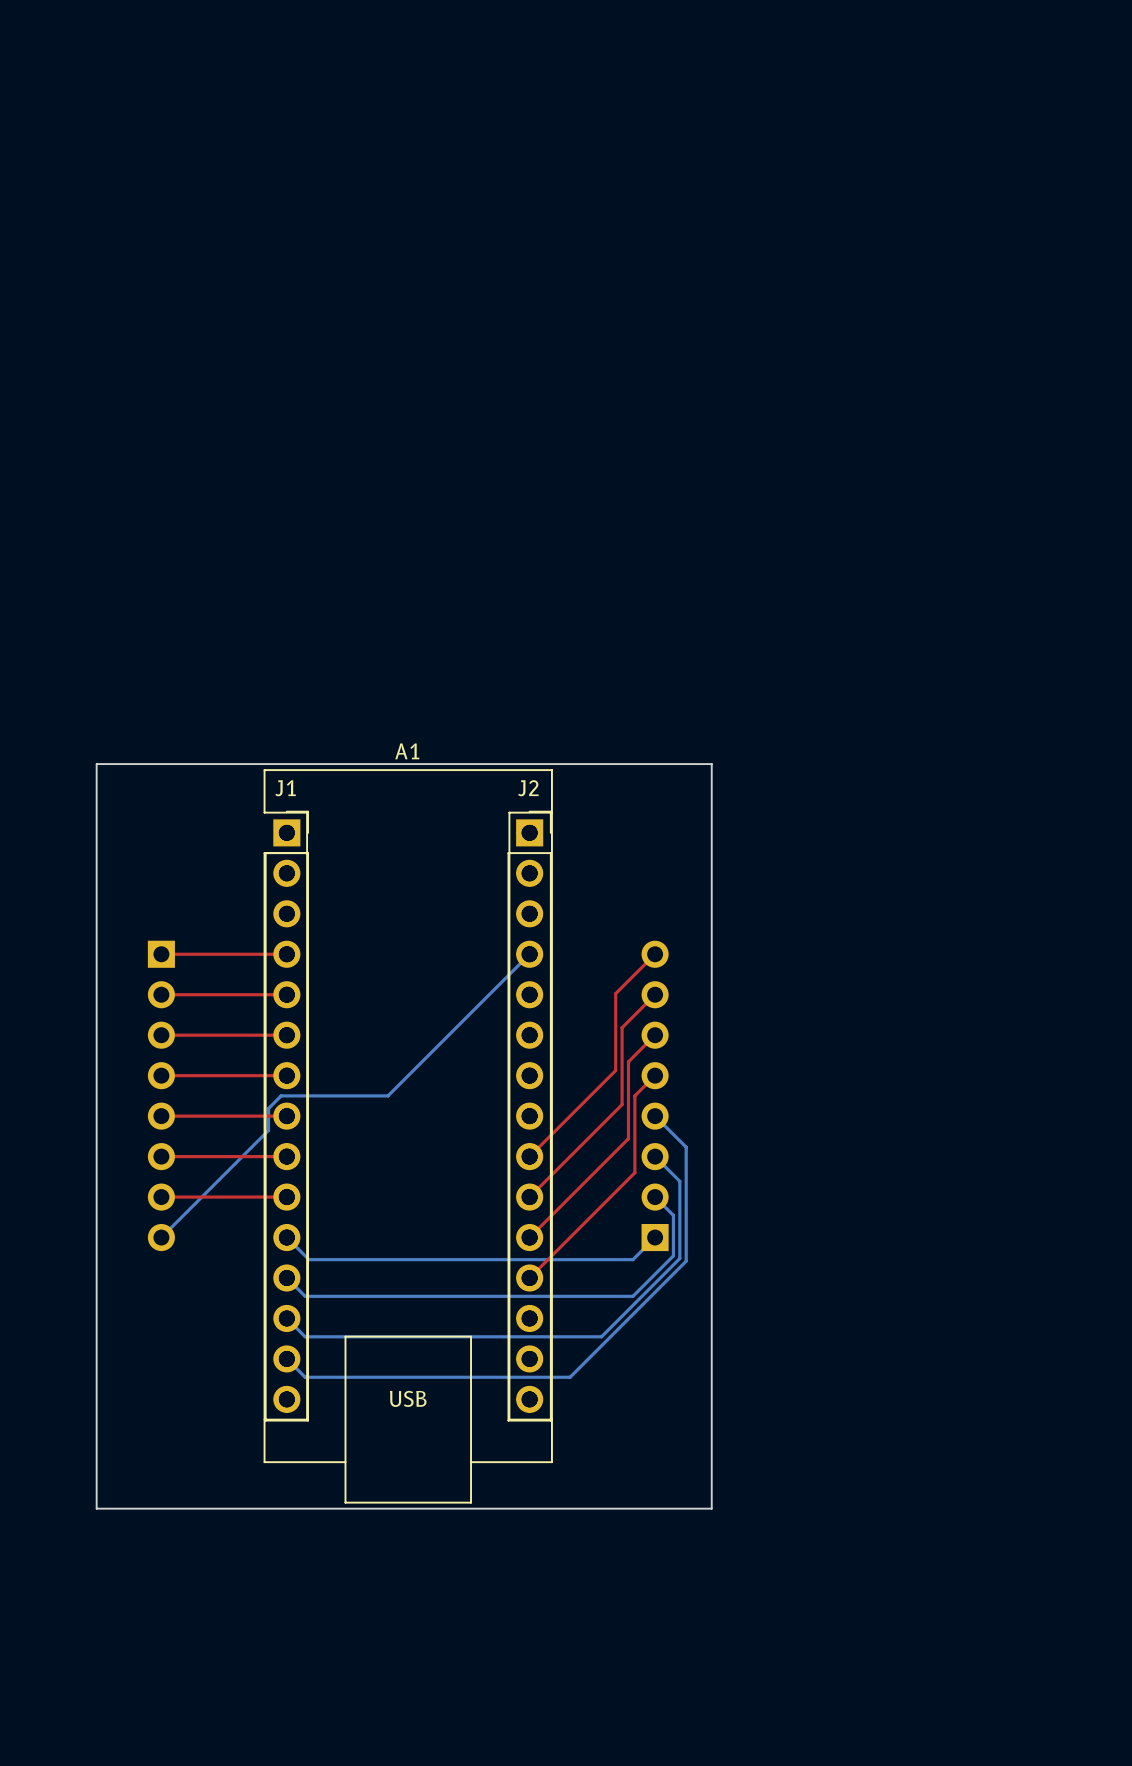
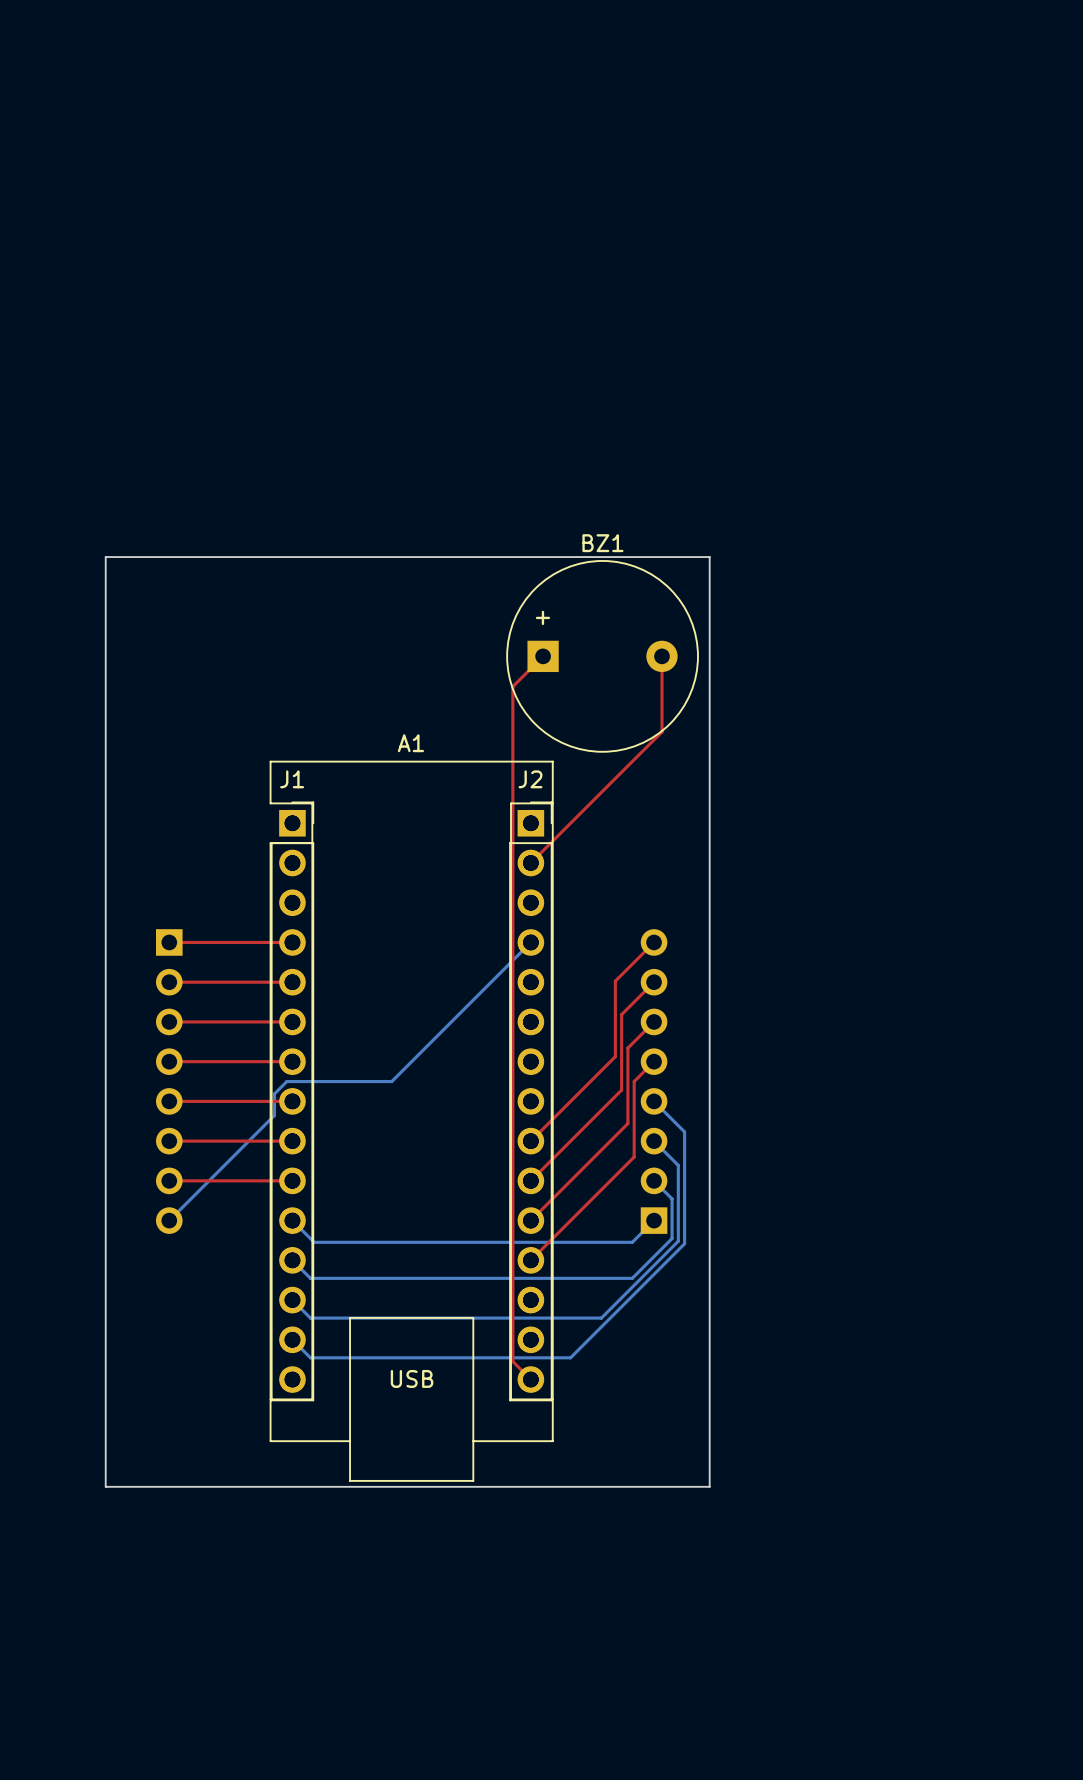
top track: none -> (543, 656) (512, 686) (512, 1361) (530, 1379)
BZ1: none -> (602, 656)
top track: none -> (662, 656) (662, 731) (530, 863)
board edge: (96, 764) (711, 764) -> (105, 755) (105, 557) (709, 557) (709, 755)

